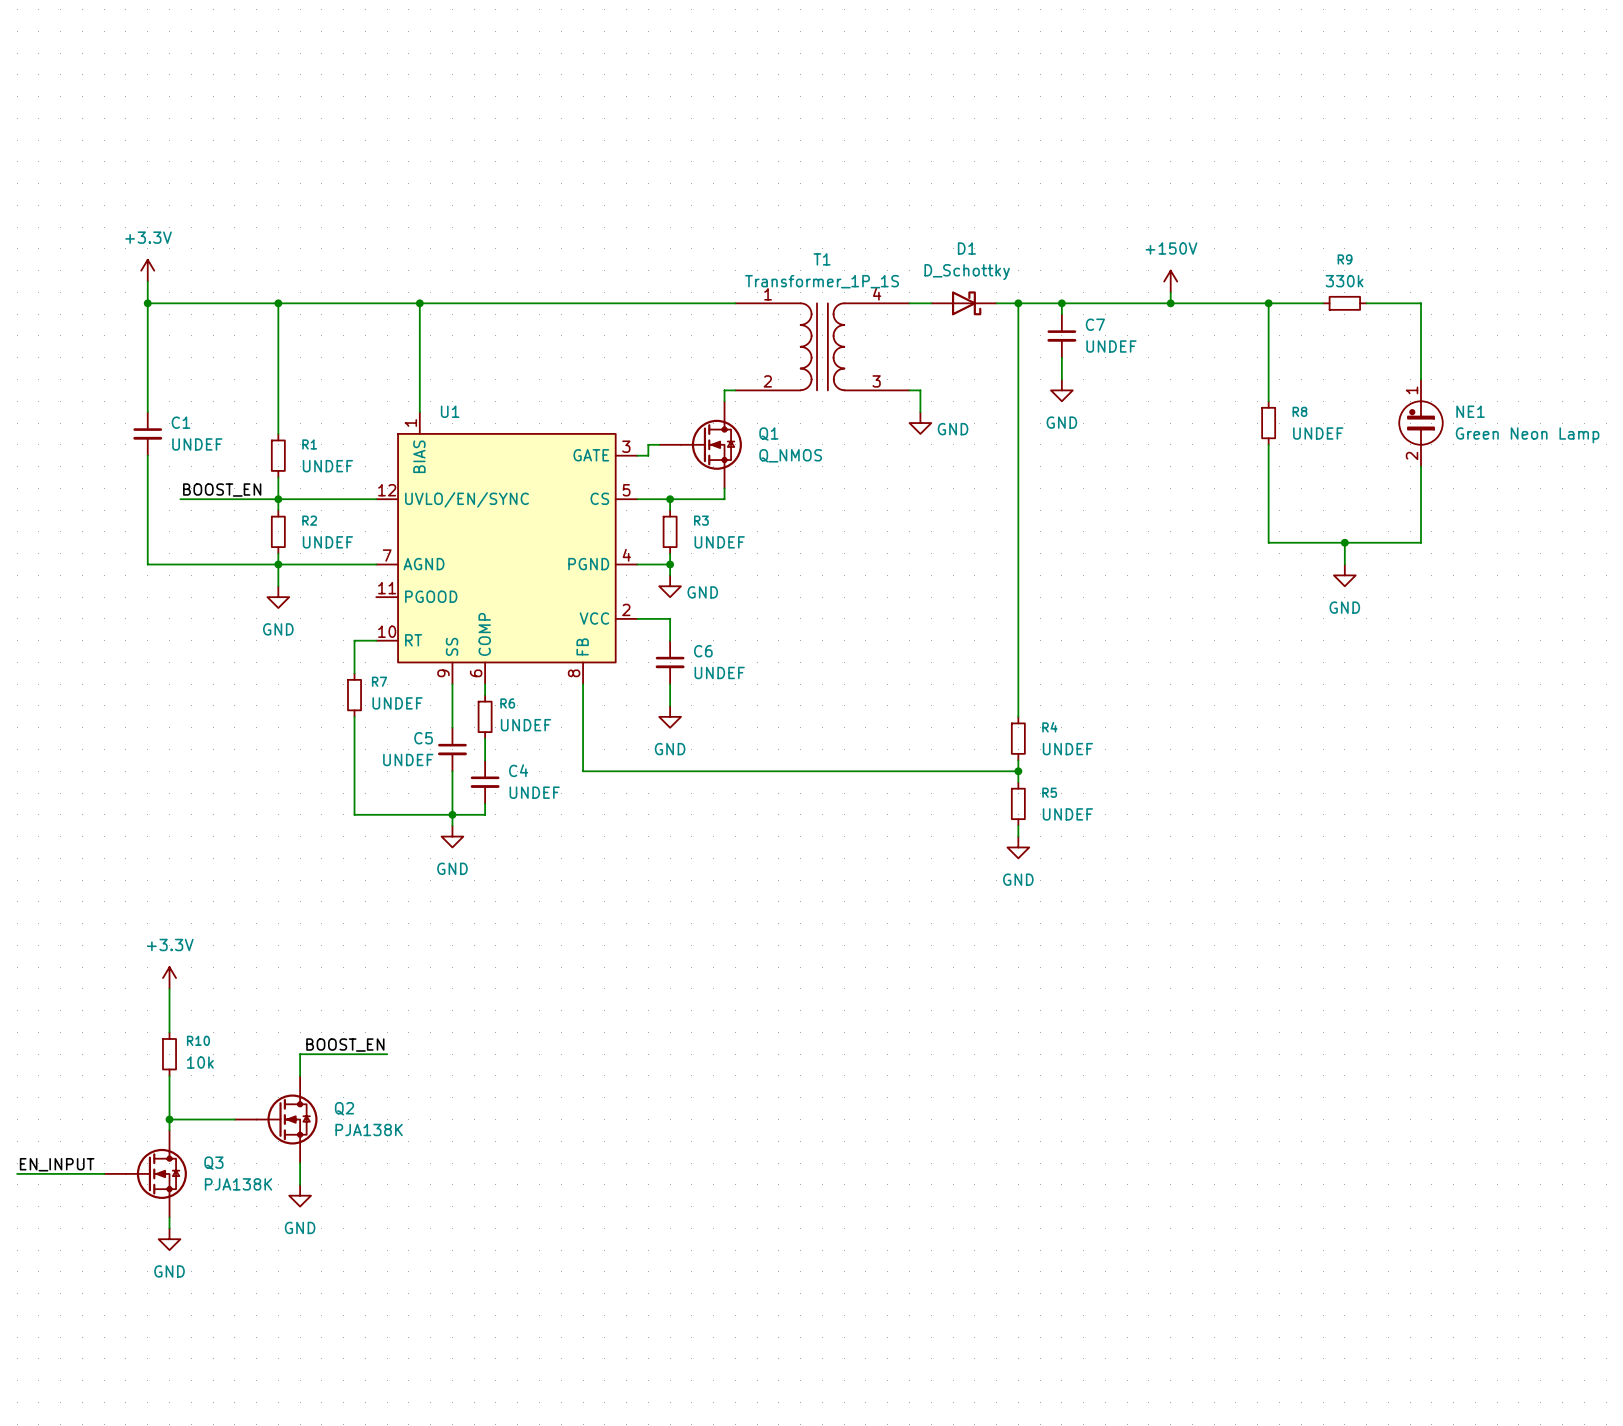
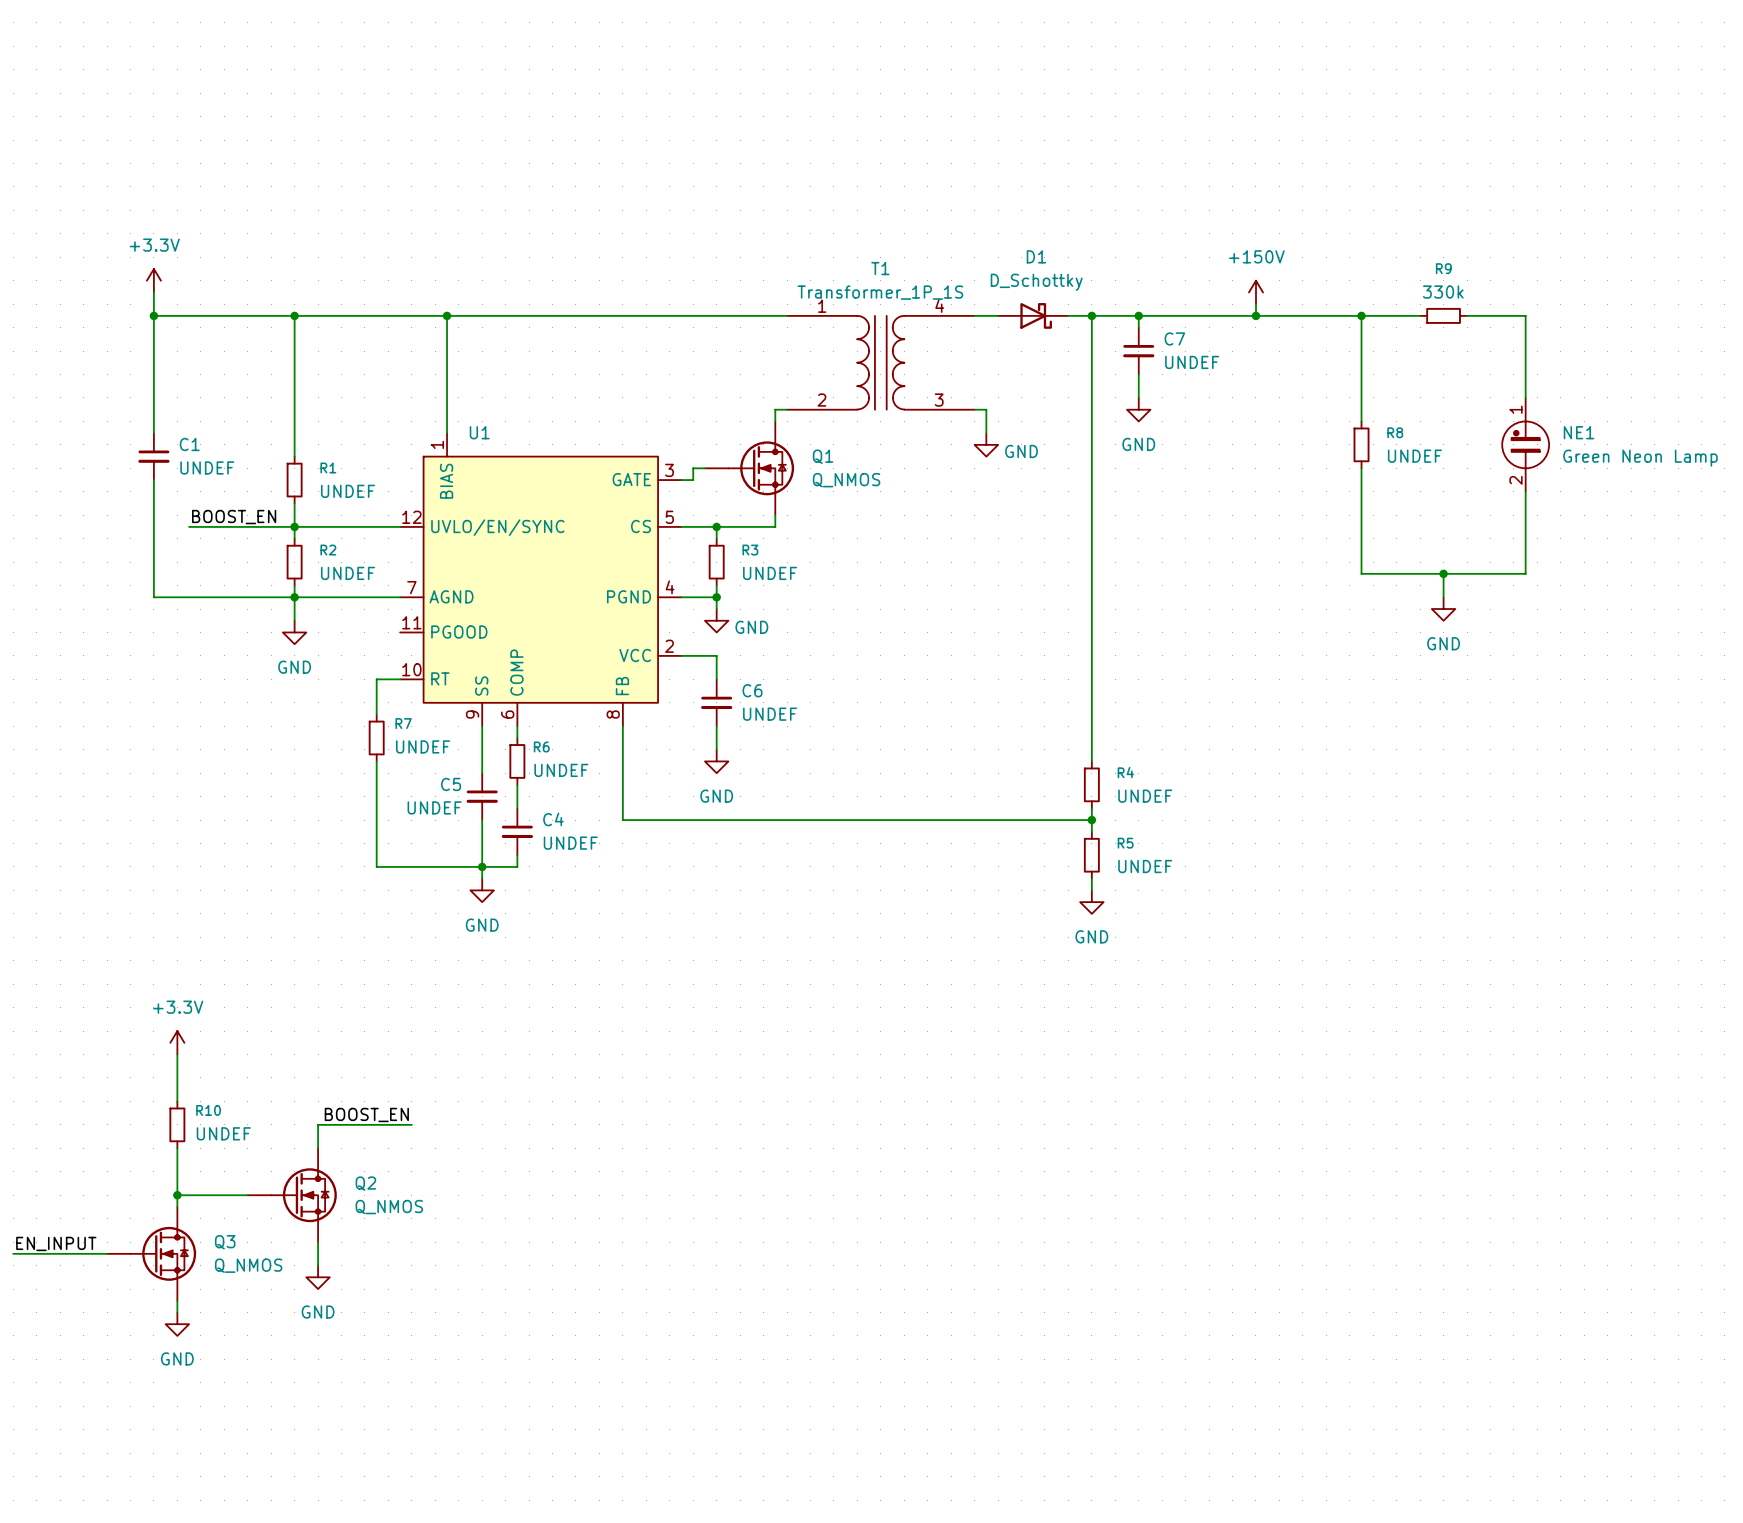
R10 value: 10k (200, 1062) -> UNDEF (223, 1133)
Q2 value: PJA138K (369, 1129) -> Q_NMOS (389, 1207)
Q3 value: PJA138K (238, 1184) -> Q_NMOS (248, 1265)

